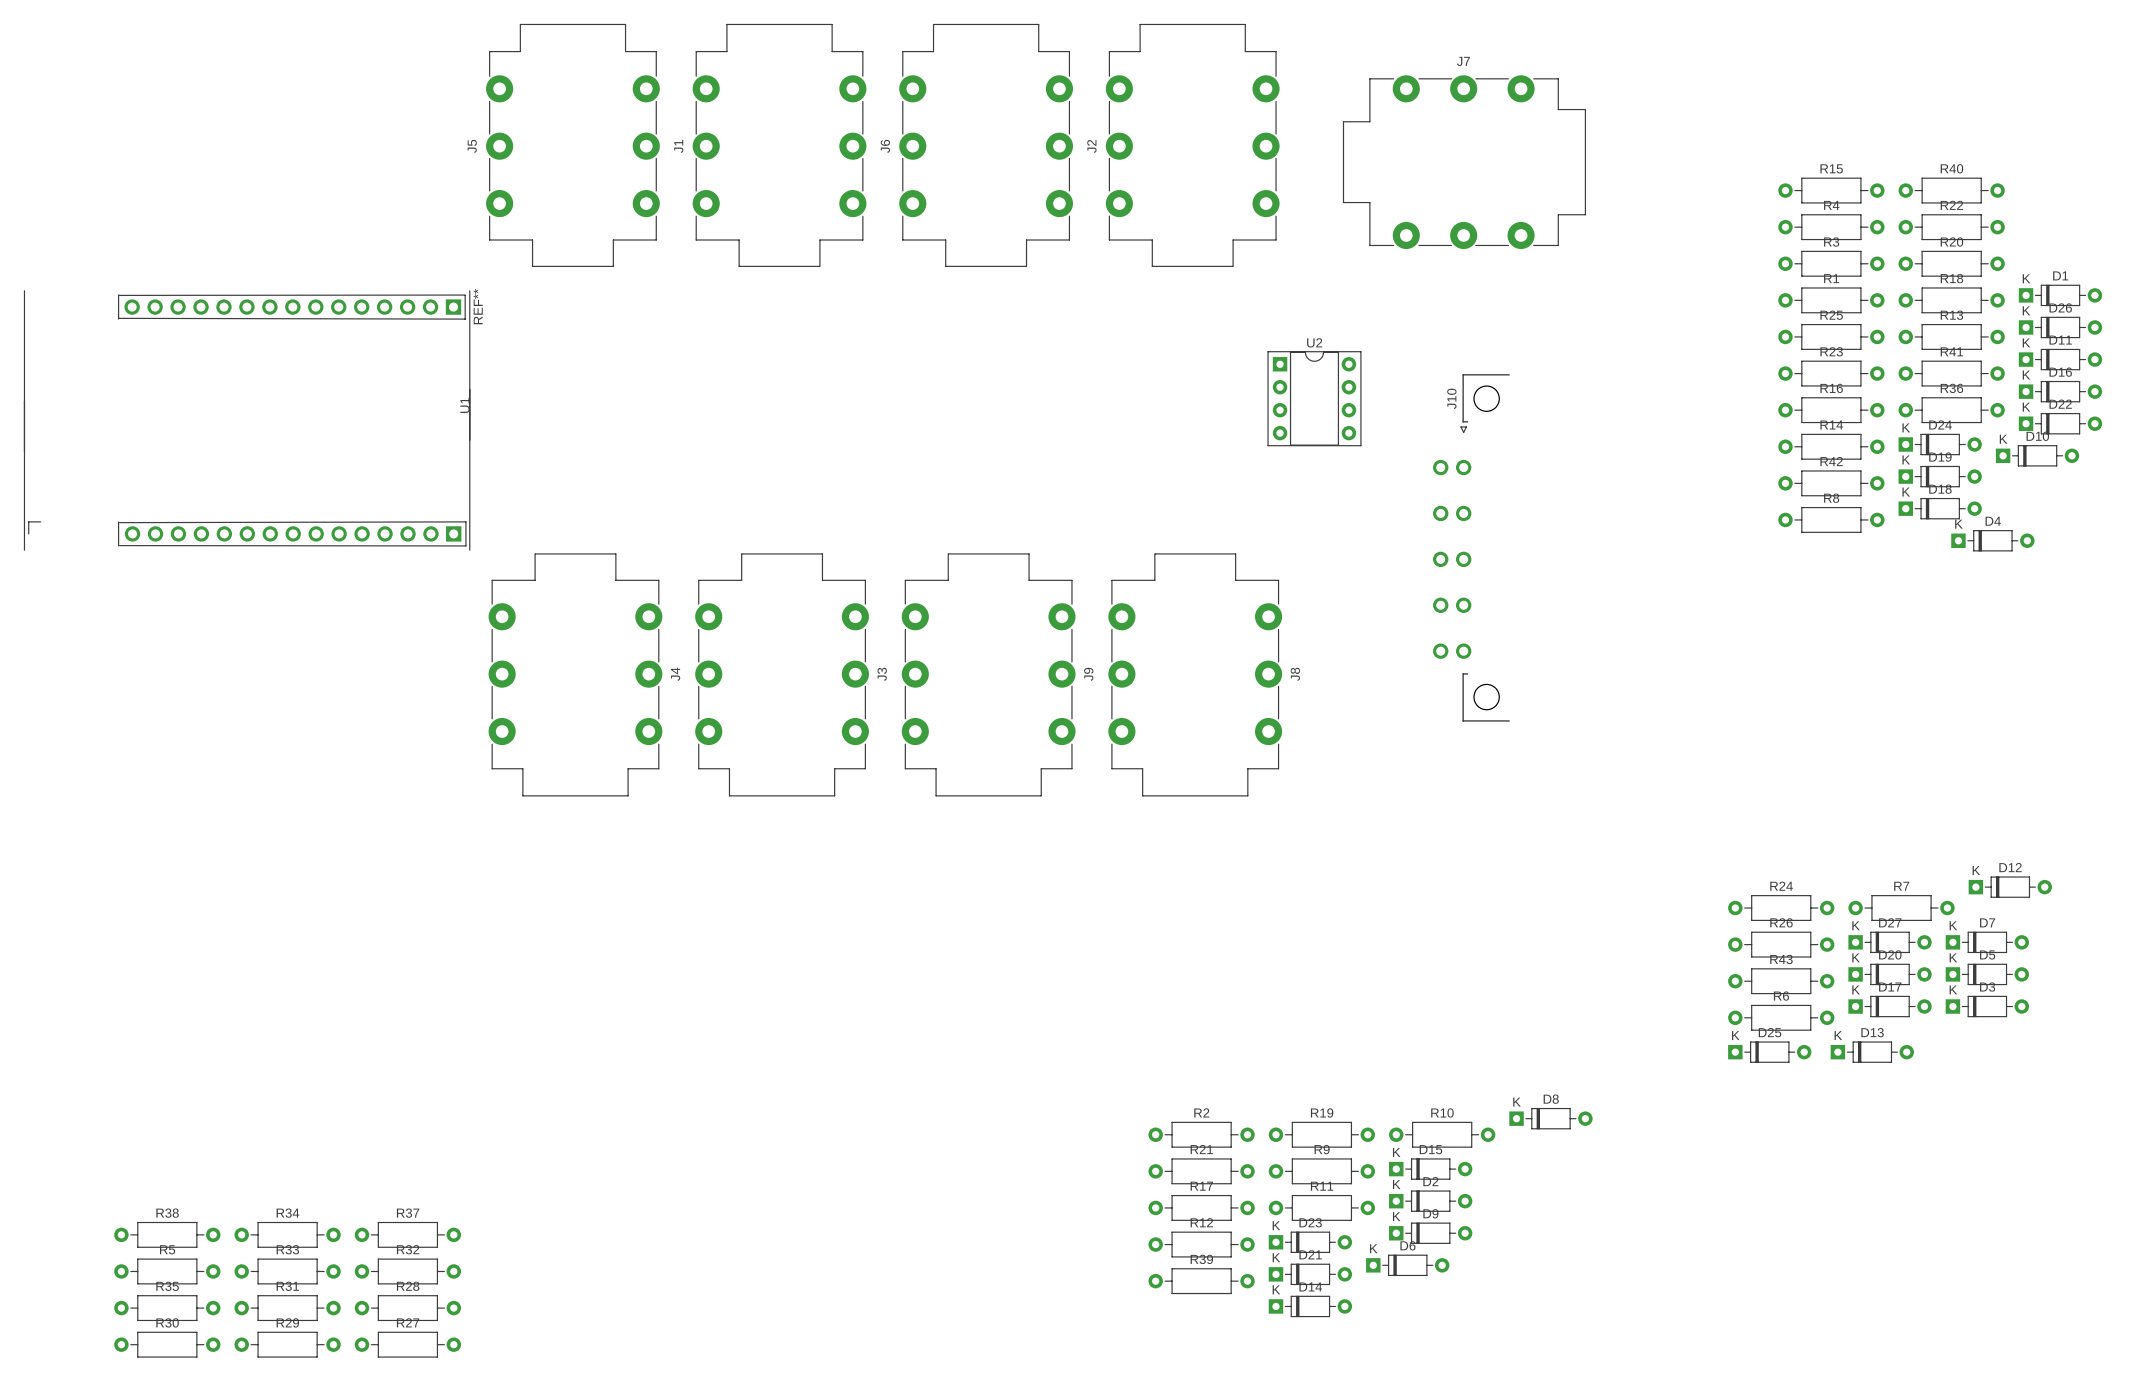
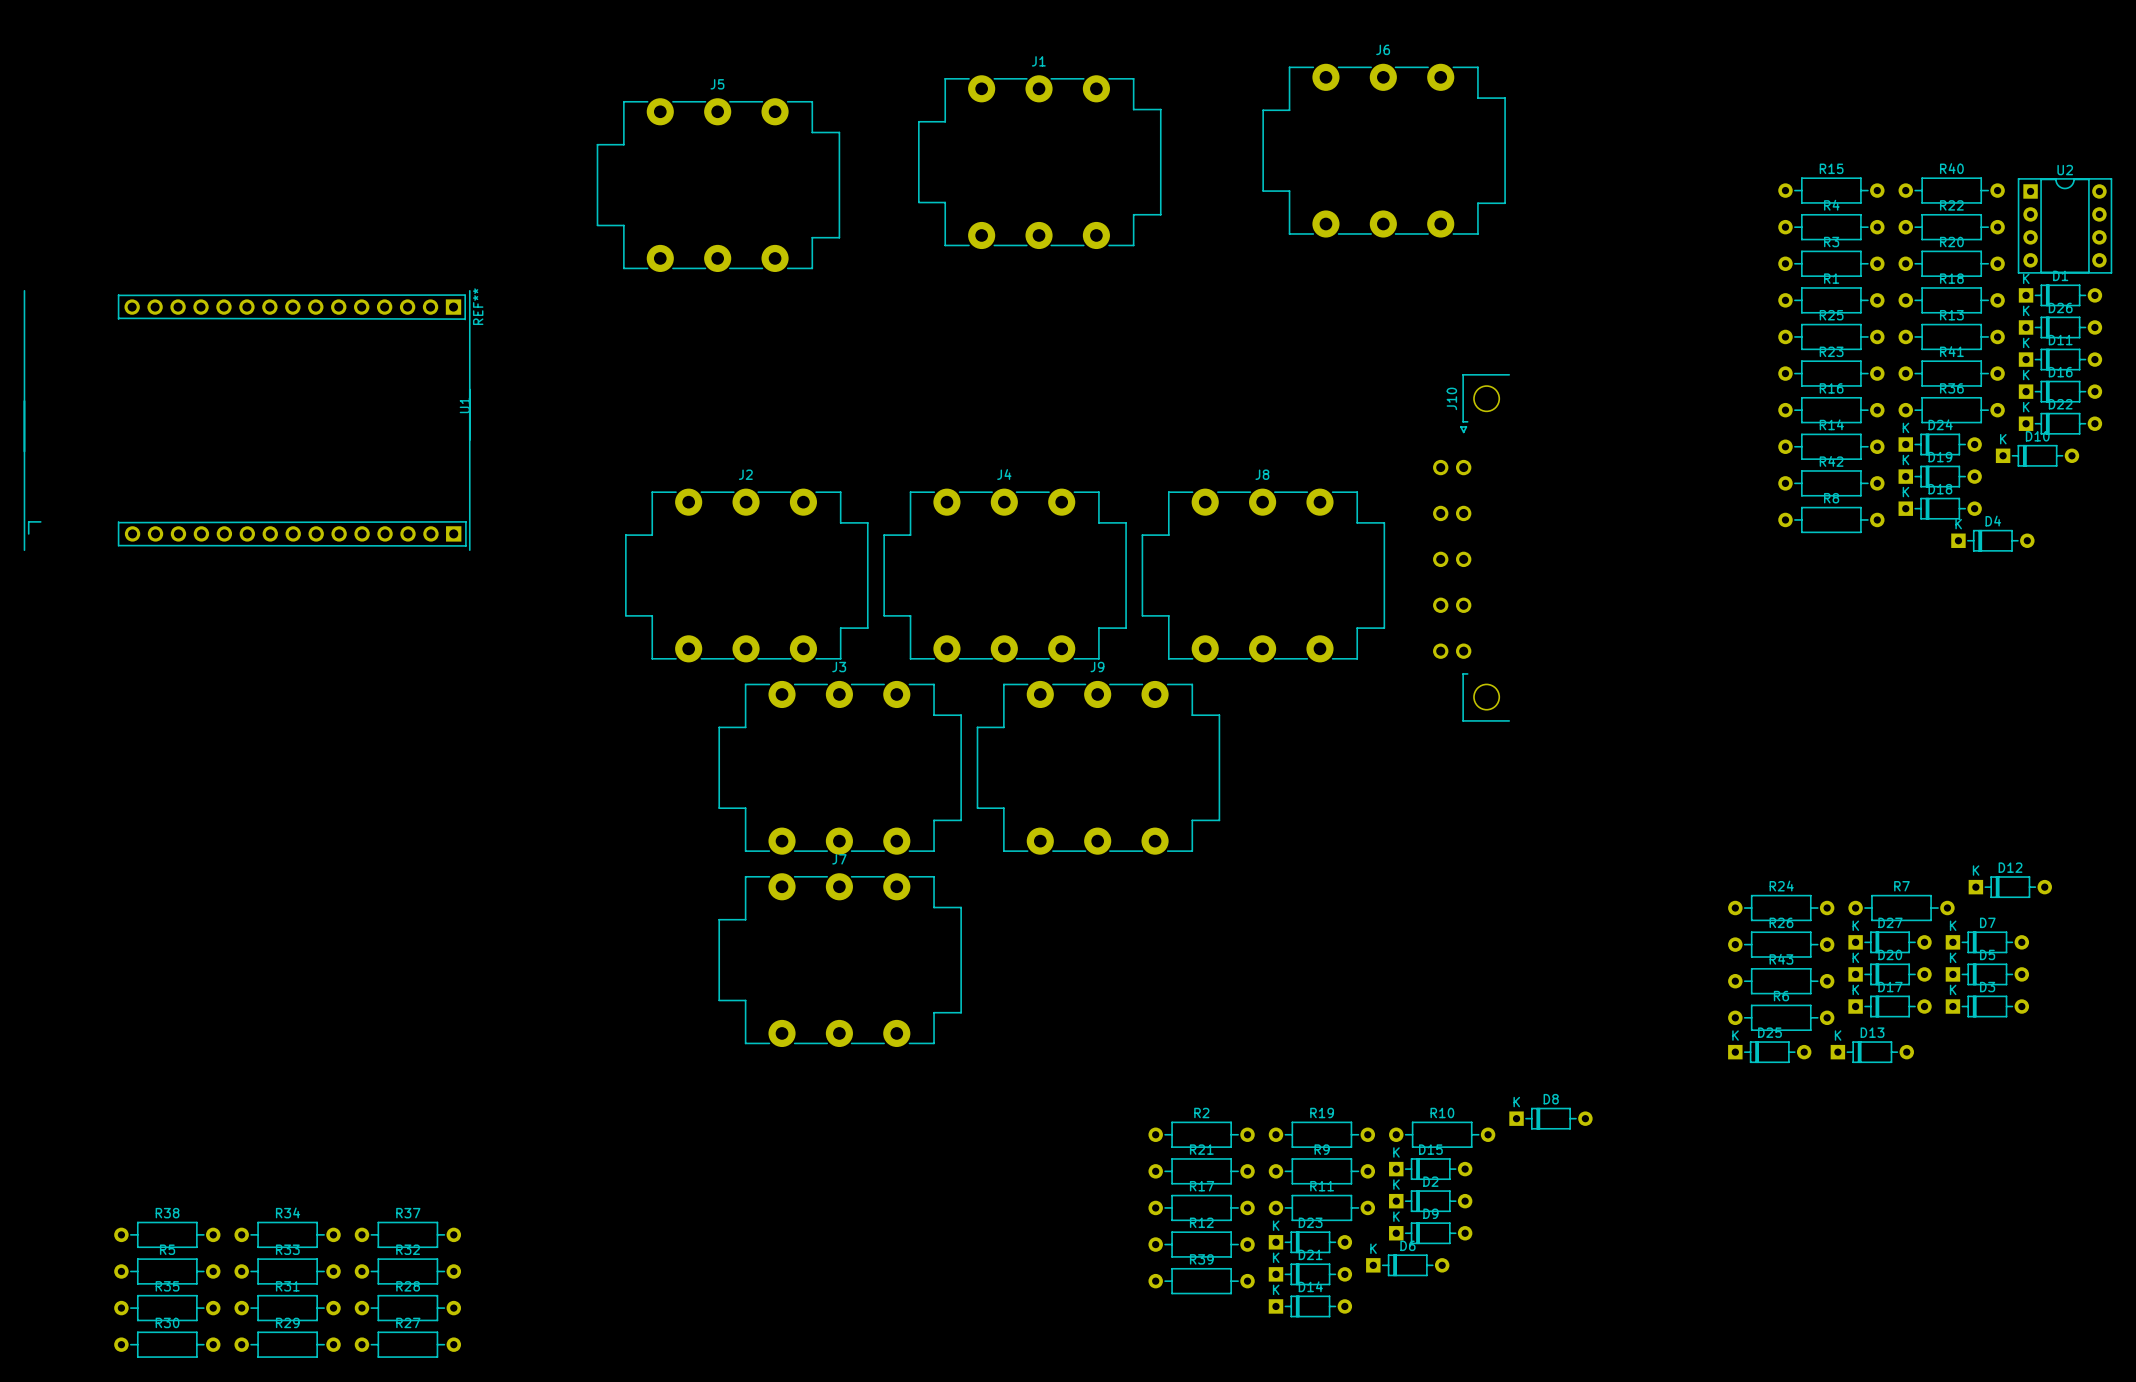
J5 rotation: 0° (572, 145) -> 90° clockwise (718, 185)
J5 position: (572, 145) -> (718, 185)
J1 rotation: 0° (779, 145) -> 90° clockwise (1039, 162)
J1 position: (779, 145) -> (1039, 162)
J6 rotation: 0° (986, 145) -> 90° clockwise (1384, 150)
J6 position: (986, 145) -> (1384, 150)
J2 rotation: 0° (1192, 145) -> 90° clockwise (746, 575)
J2 position: (1192, 145) -> (746, 575)
J7 position: (1464, 162) -> (840, 960)
U2 position: (1314, 398) -> (2065, 225)
J4 rotation: 0° (575, 674) -> 90° counterclockwise (1005, 575)
J4 position: (575, 674) -> (1005, 575)
J3 rotation: 0° (782, 674) -> 90° counterclockwise (840, 767)
J9 rotation: 0° (988, 674) -> 90° counterclockwise (1098, 767)
J8 rotation: 0° (1195, 674) -> 90° counterclockwise (1263, 575)

